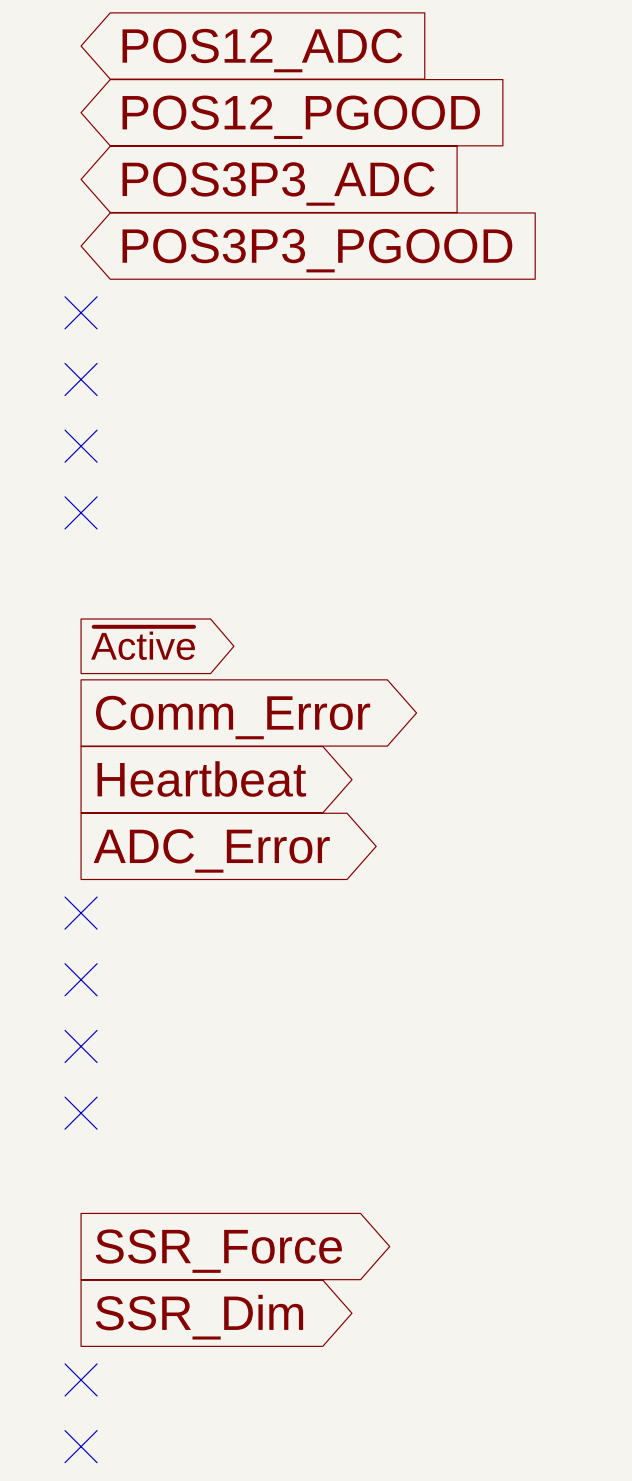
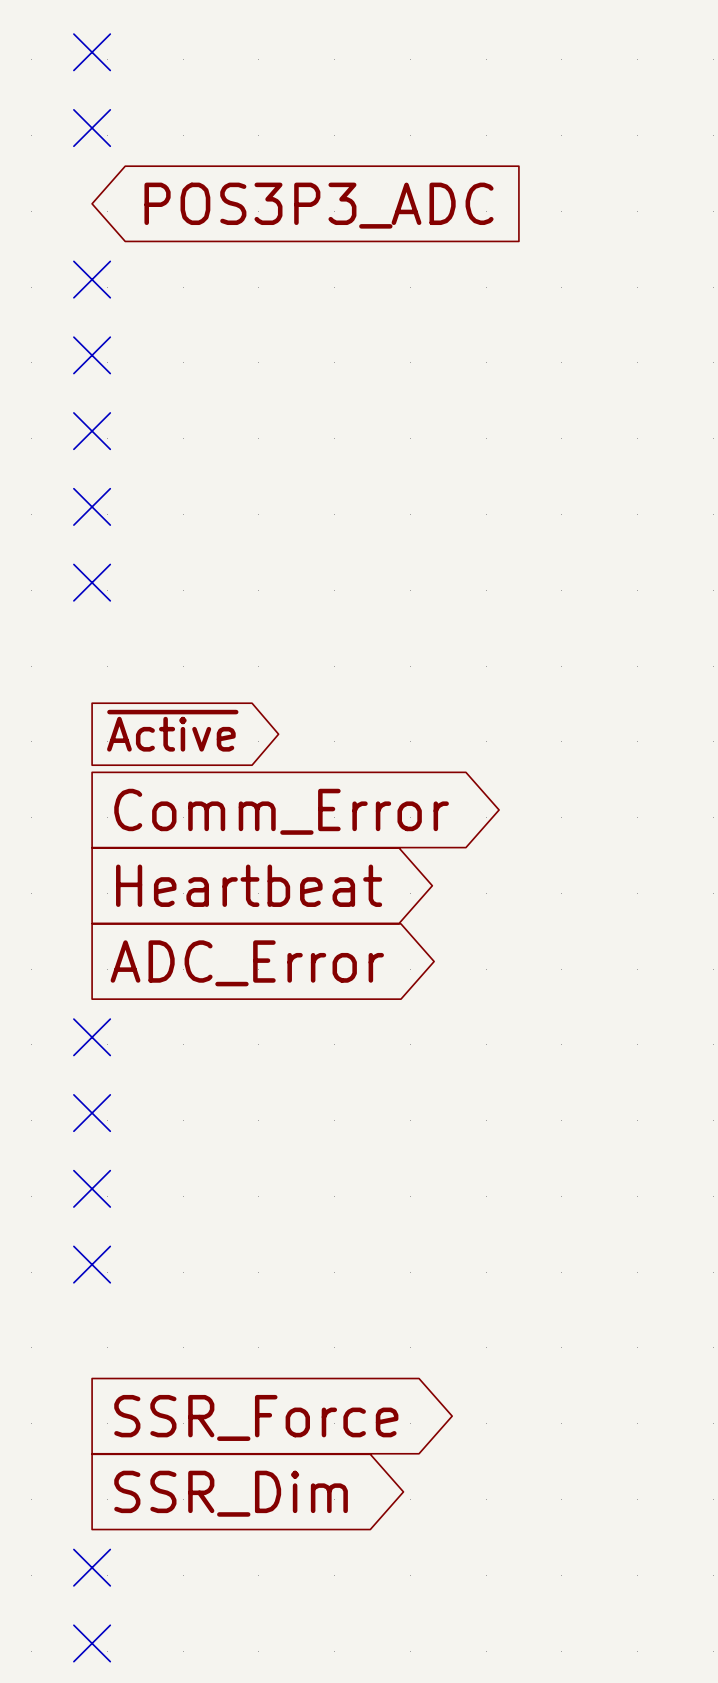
no-connect mark: none -> (92, 52)
global label: POS12_ADC (262, 50) -> none
no-connect mark: none -> (92, 128)
global label: POS12_PGOOD (301, 117) -> none
no-connect mark: none -> (92, 279)
global label: POS3P3_PGOOD (317, 250) -> none

